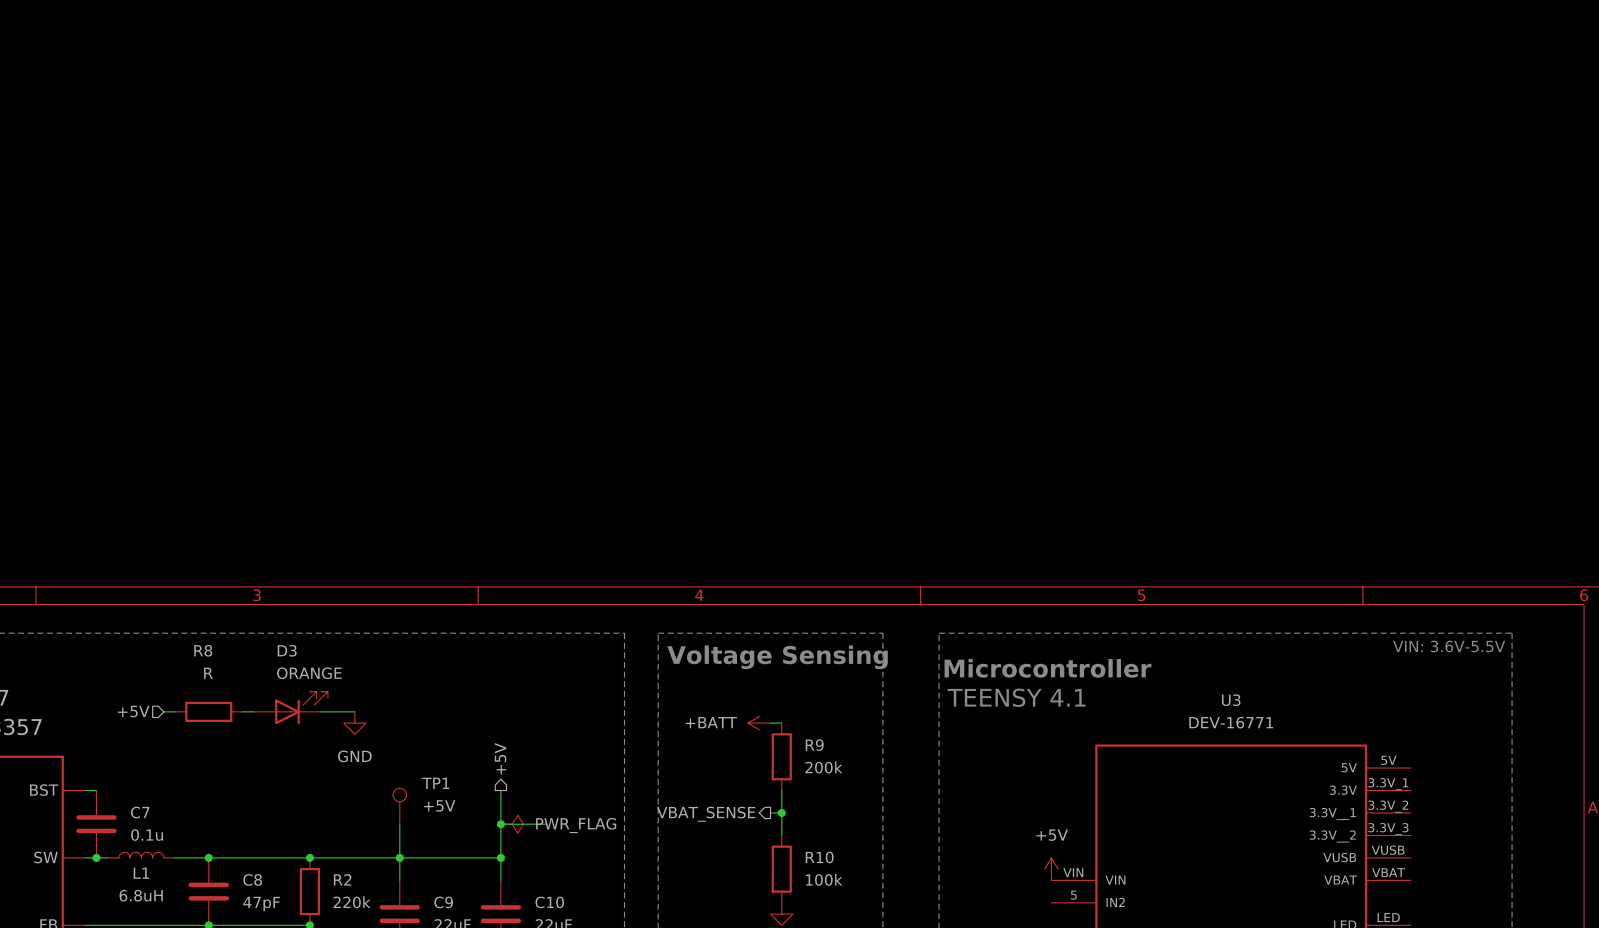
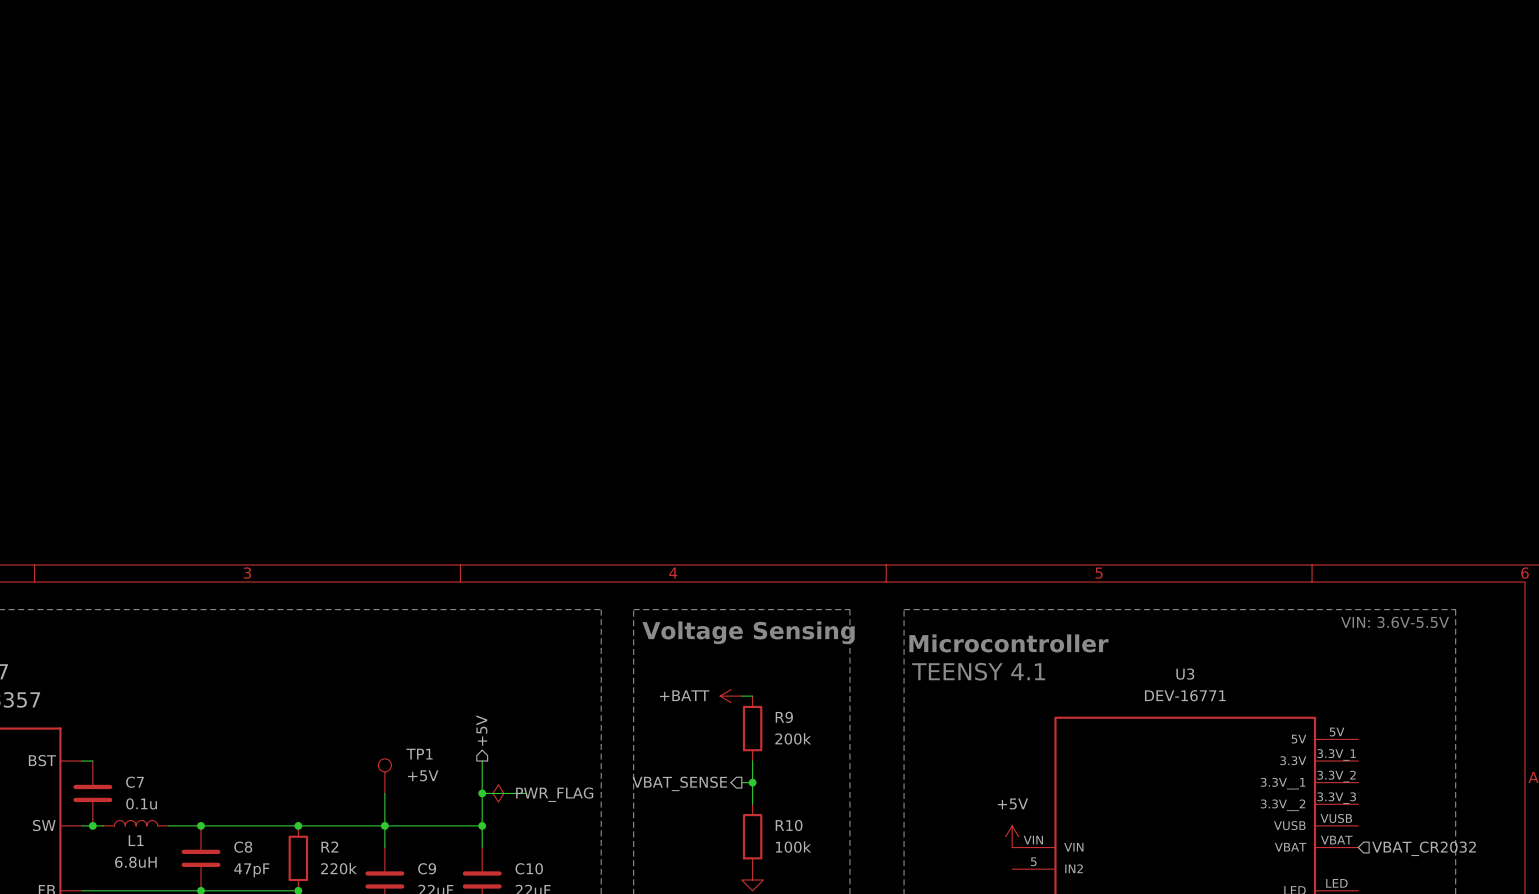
D3: ORANGE (290, 707) -> none
hierarchical label: +5V (133, 711) -> none
wire: (163, 711) (175, 711) -> none
R8: R (208, 711) -> none
wire: (242, 711) (253, 711) -> none
wire: (321, 711) (354, 711) -> none
power symbol: GND (354, 723) -> none
hierarchical label: none -> VBAT_CR2032 (1424, 848)

